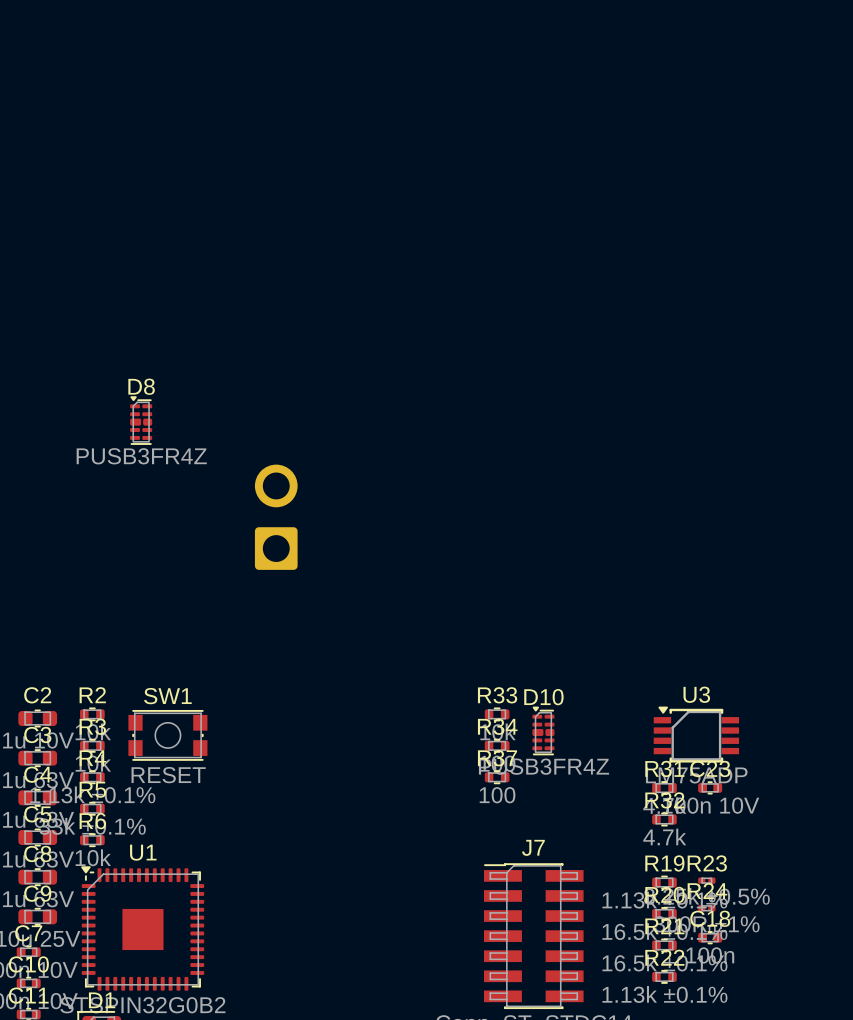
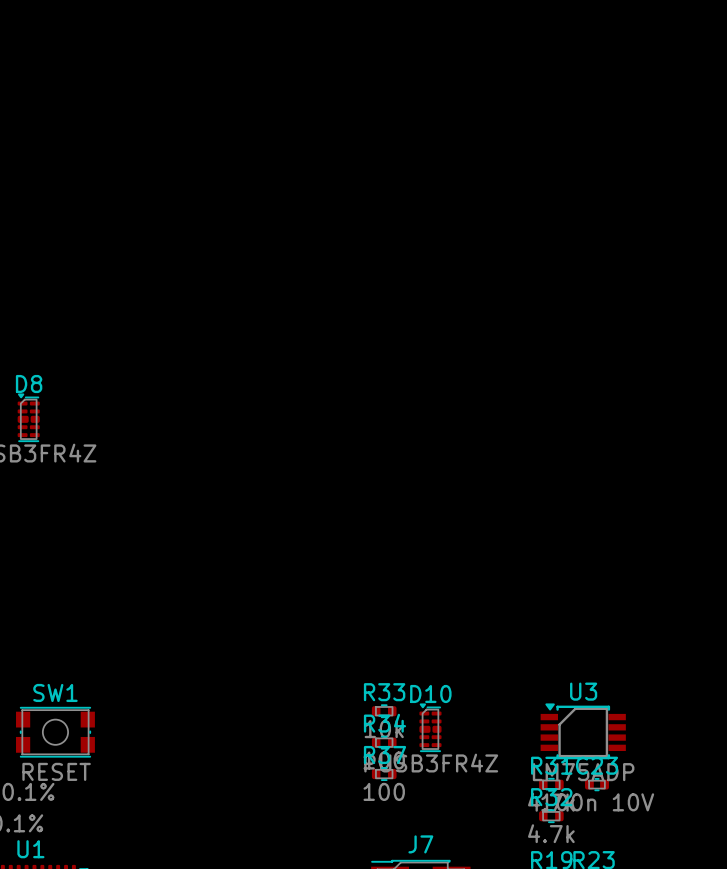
part: (276, 517) -> none

